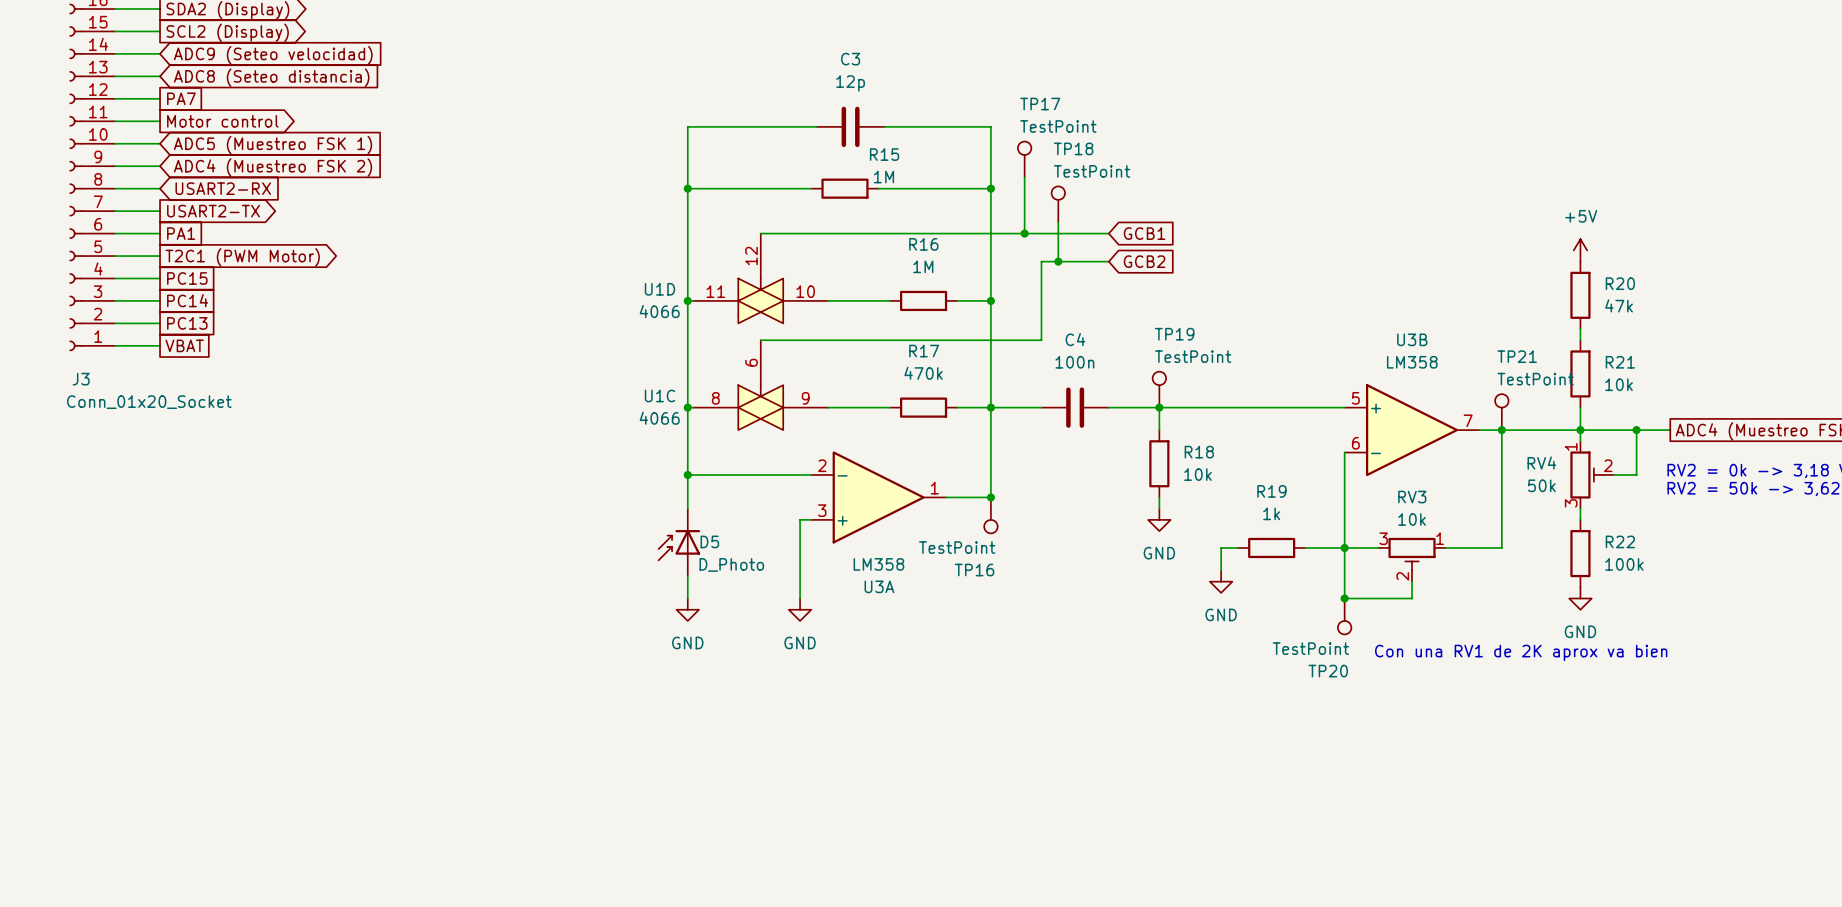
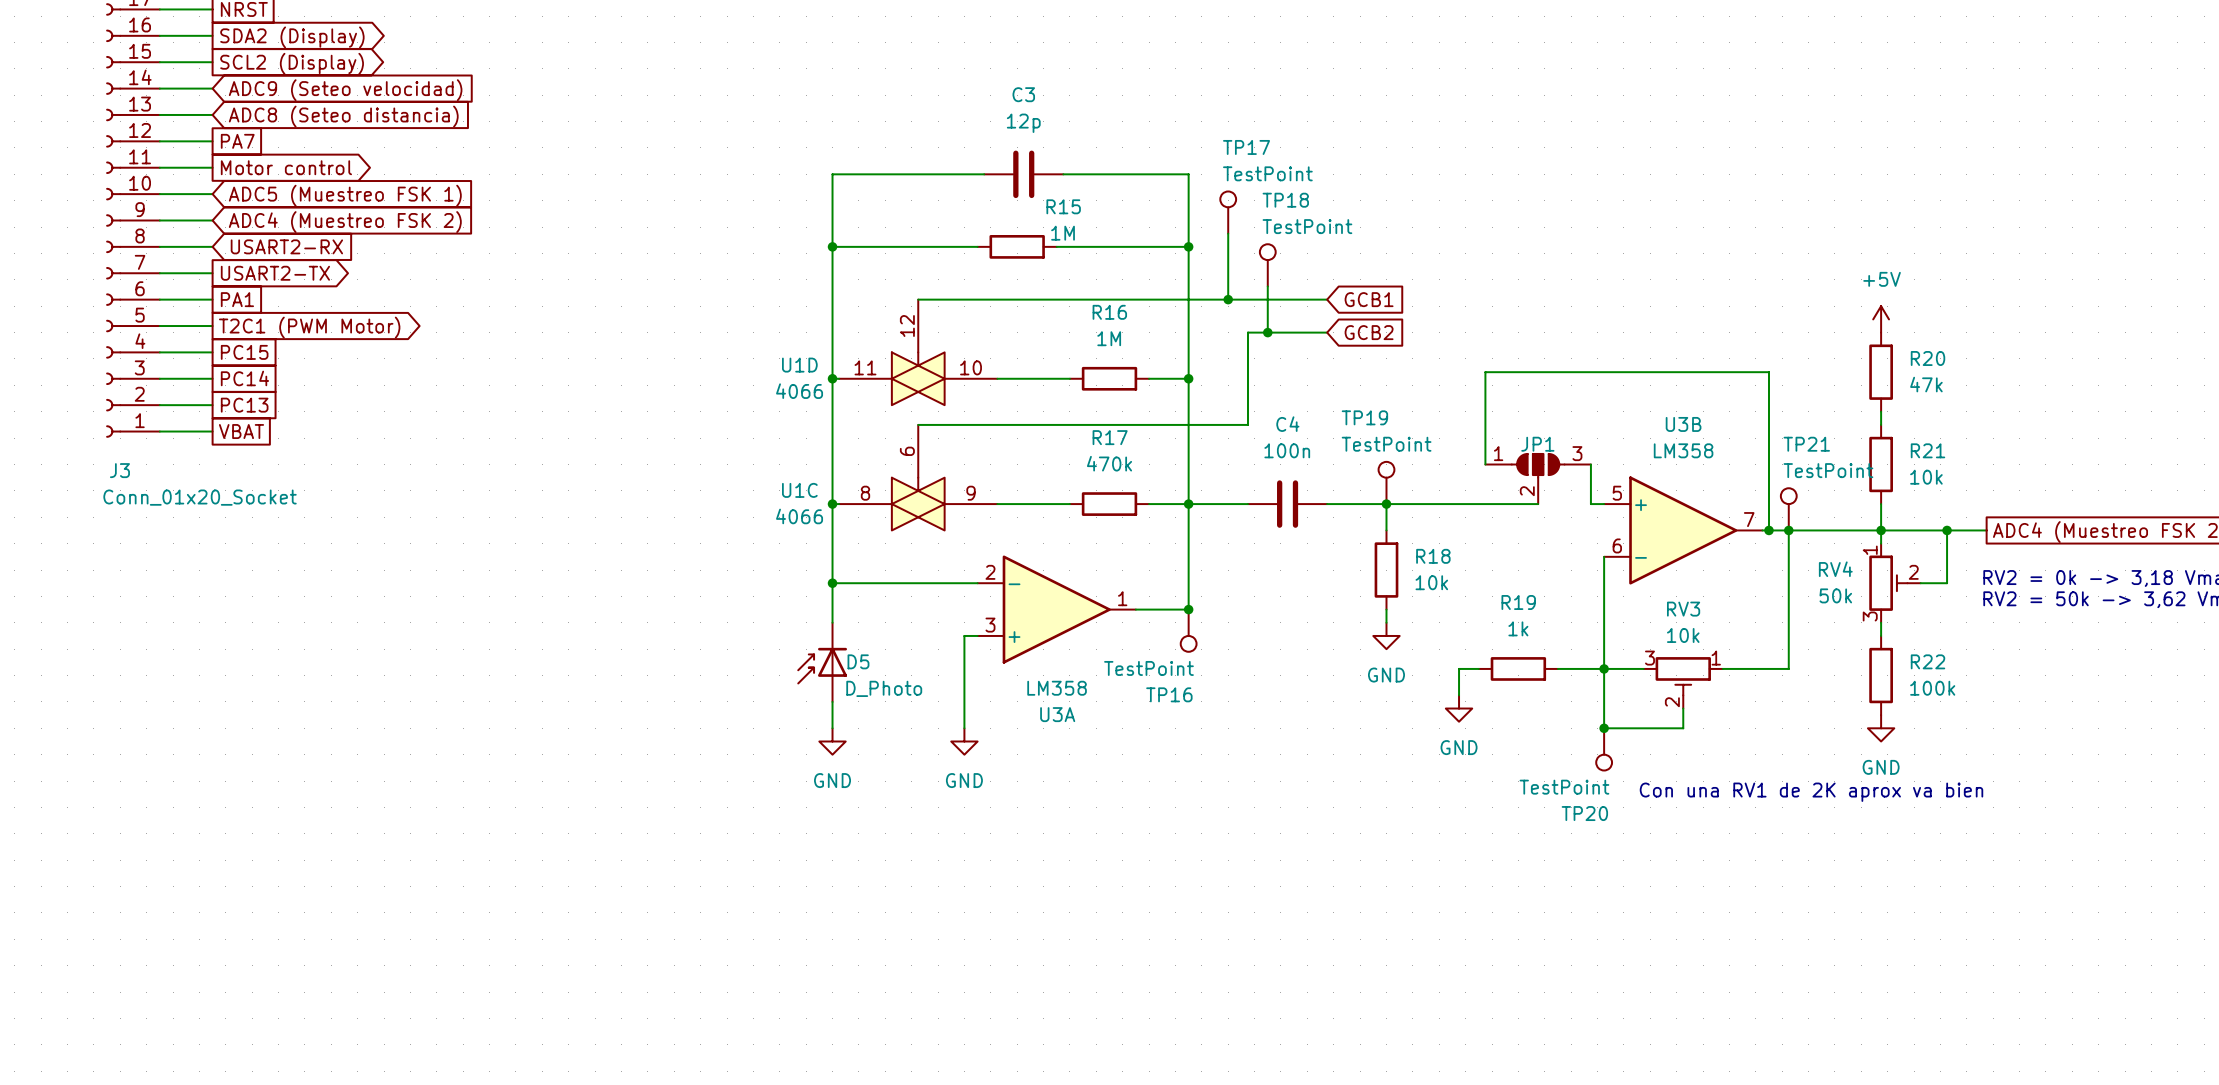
TP19 name position: TP19 (1174, 334) -> TP19 (1364, 417)
TP19 value position: TestPoint (1193, 356) -> TestPoint (1386, 444)
wire: none -> (1485, 464) (1485, 372) (1768, 372) (1768, 530)
JP1: none -> (1538, 479)
wire: (1288, 407) (1333, 407) -> (1590, 464) (1590, 504)
junction: none -> (1768, 530)

